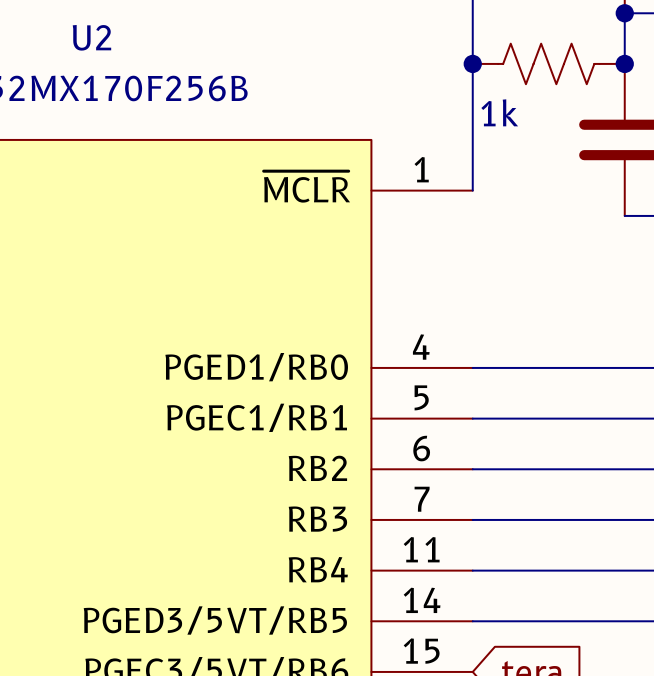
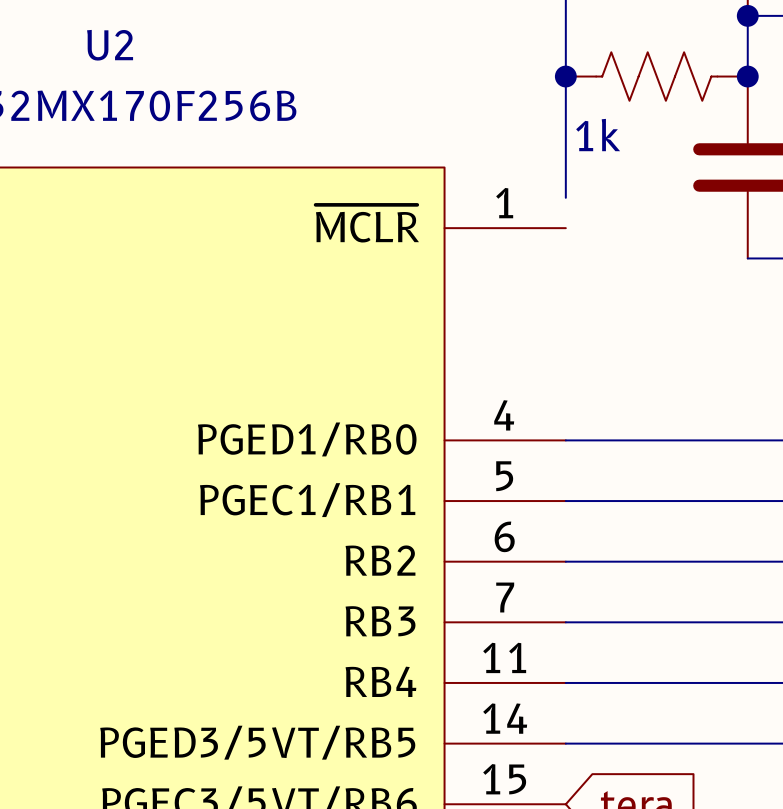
wire: (472, 165) (472, 190) -> none

